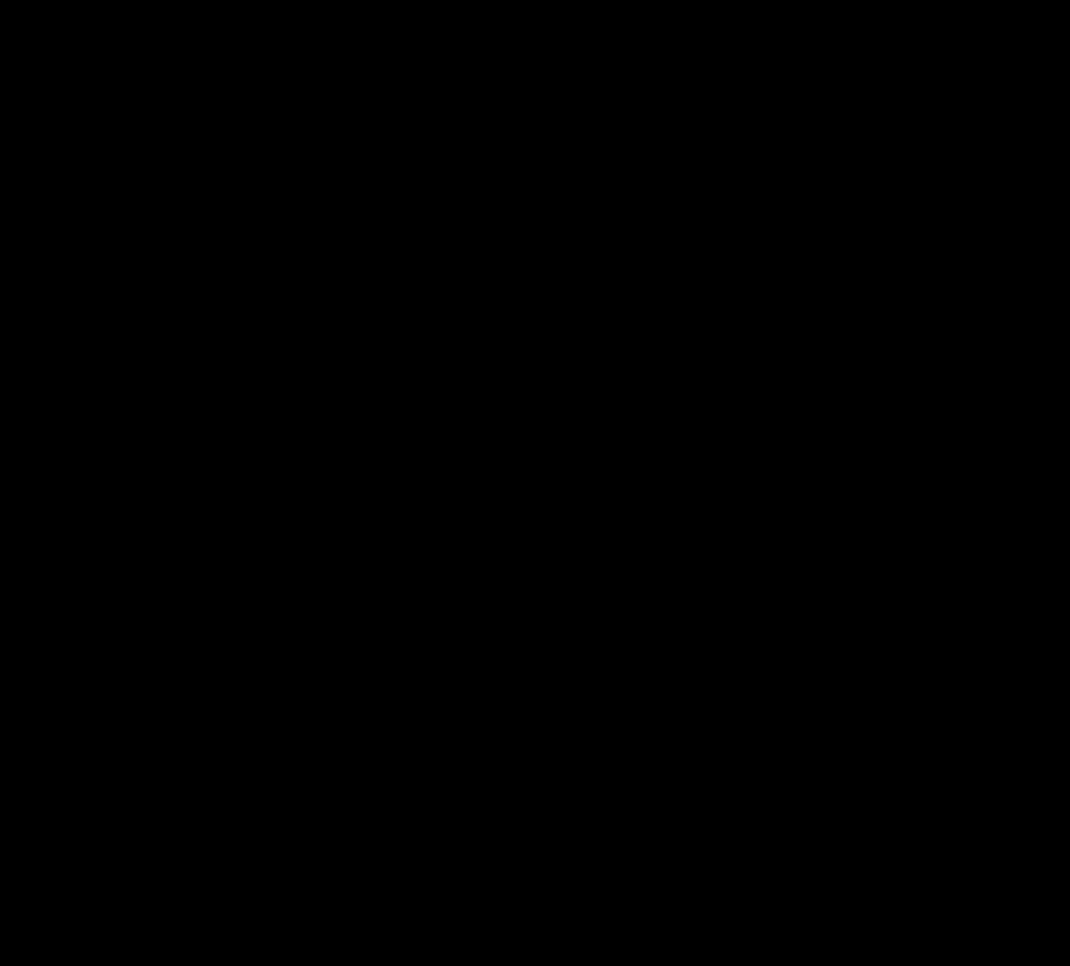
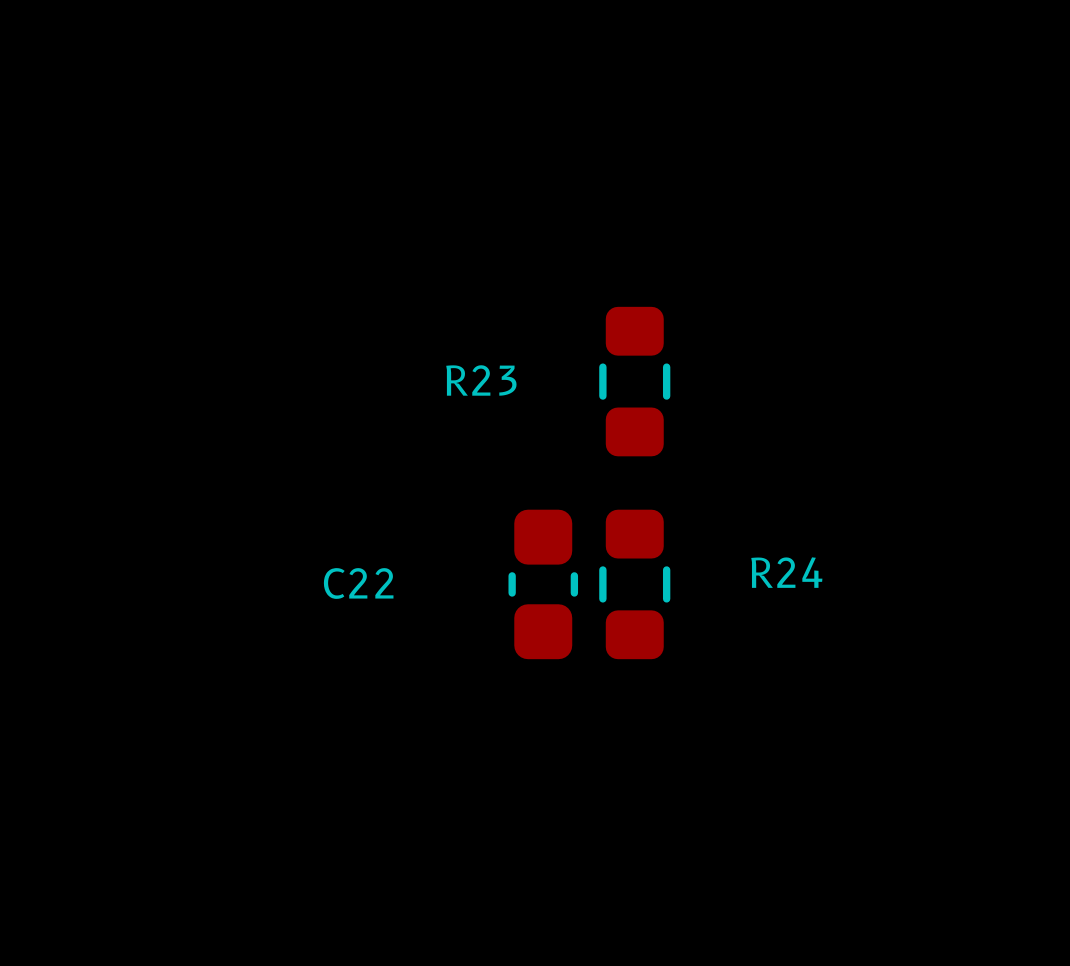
R23: none -> (634, 381)
C22: none -> (543, 584)
R24: none -> (634, 584)

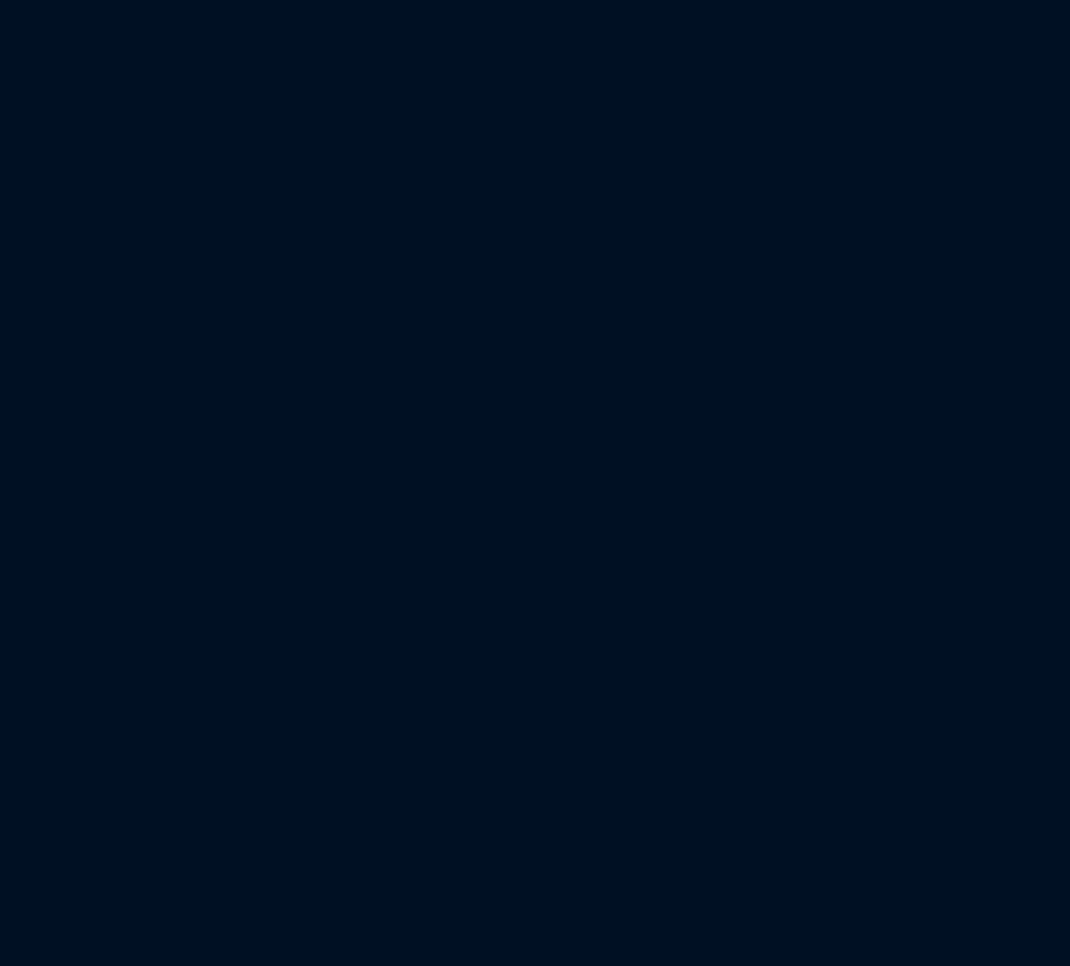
R23: (634, 381) -> none
C22: (543, 584) -> none
R24: (634, 584) -> none

